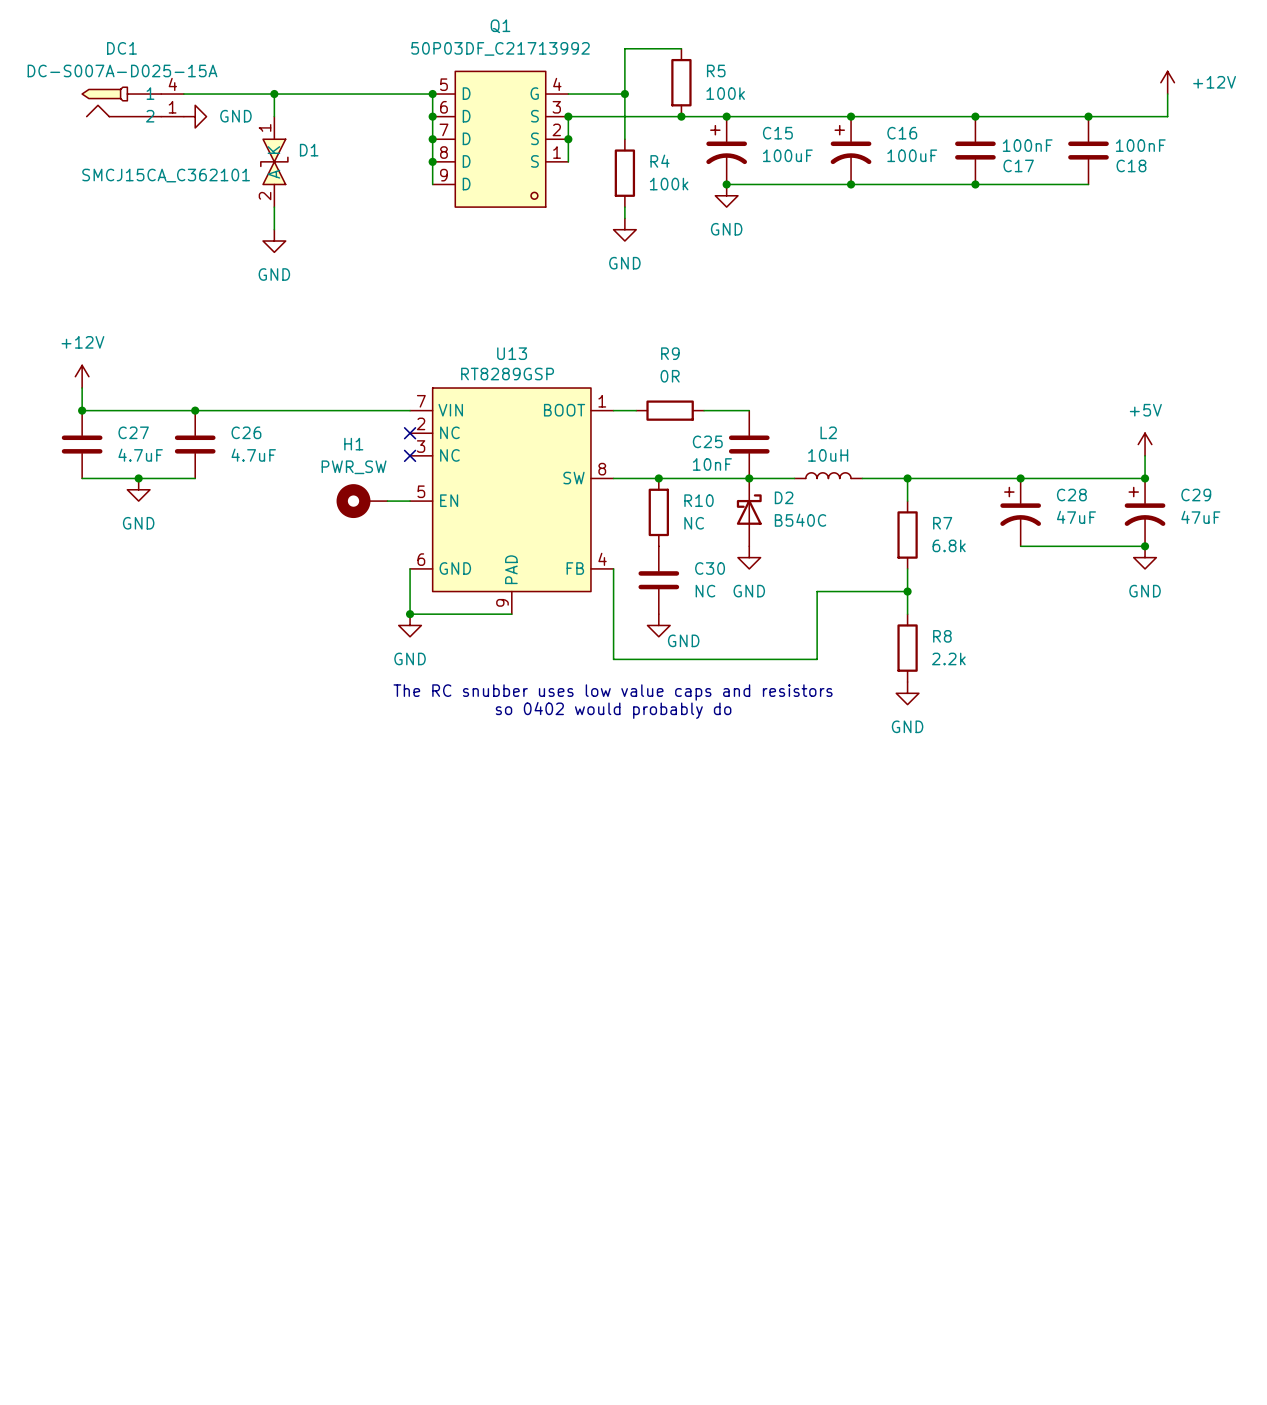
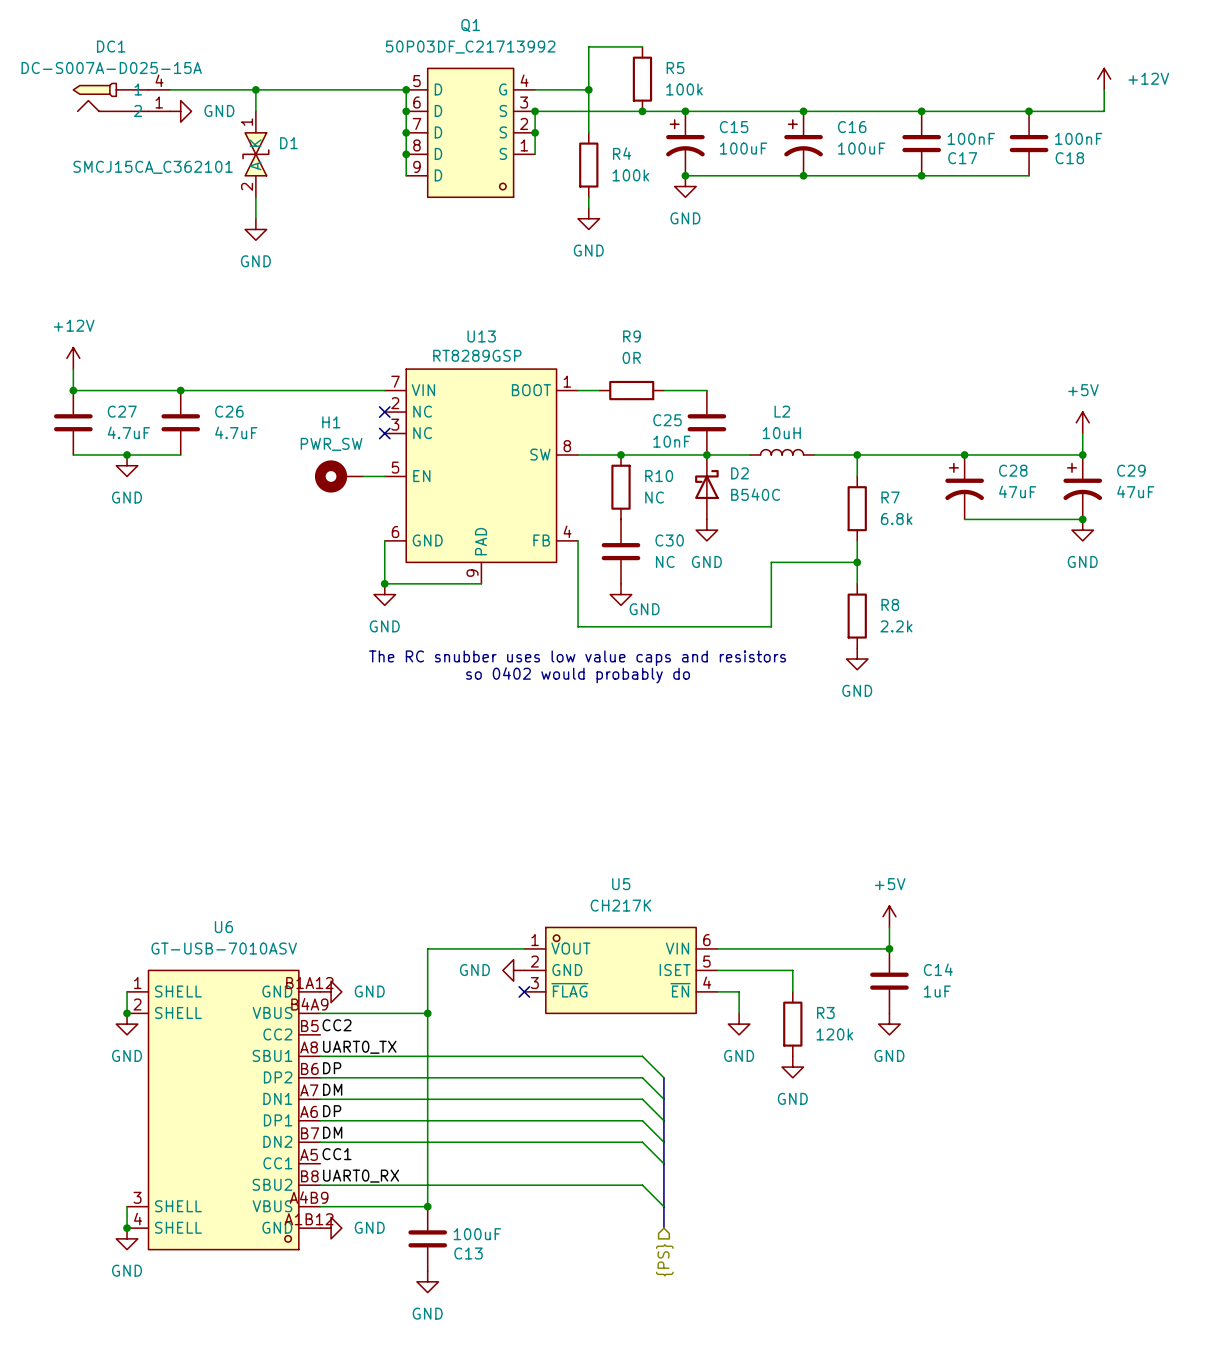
power symbol: none -> +5V (889, 916)
wire: none -> (889, 927) (889, 948) (717, 948)
wire: none -> (524, 948) (427, 948) (427, 1206) (320, 1206)
junction: none -> (889, 948)
power symbol: none -> GND (513, 970)
U5: none -> CH217K (620, 970)
wire: none -> (717, 970) (792, 970) (792, 991)
C14: none -> 1uF (889, 981)
wire: none -> (127, 991) (127, 1013)
power symbol: none -> GND (331, 991)
no-connect mark: none -> (524, 991)
wire: none -> (717, 991) (739, 991) (739, 1013)
junction: none -> (127, 1013)
wire: none -> (320, 1013) (427, 1013)
junction: none -> (427, 1013)
power symbol: none -> GND (127, 1024)
power symbol: none -> GND (739, 1024)
R3: none -> 120k (792, 1024)
power symbol: none -> GND (889, 1024)
label: none -> CC2 (337, 1025)
label: none -> UART0_TX (359, 1047)
wire: none -> (320, 1056) (642, 1056) (663, 1077)
power symbol: none -> GND (792, 1067)
label: none -> DP (332, 1068)
wire: none -> (320, 1077) (642, 1077) (663, 1099)
bus: none -> (663, 1077) (663, 1228)
label: none -> DM (332, 1089)
wire: none -> (320, 1099) (642, 1099) (663, 1120)
U6: none -> GT-USB-7010ASV (223, 1110)
label: none -> DP (332, 1111)
wire: none -> (320, 1120) (642, 1120) (663, 1142)
label: none -> DM (332, 1132)
wire: none -> (320, 1142) (642, 1142) (663, 1163)
label: none -> CC1 (337, 1154)
label: none -> UART0_RX (361, 1176)
wire: none -> (320, 1185) (642, 1185) (663, 1206)
wire: none -> (127, 1206) (127, 1228)
junction: none -> (427, 1206)
junction: none -> (127, 1228)
power symbol: none -> GND (331, 1228)
power symbol: none -> GND (127, 1238)
C13: none -> 100uF (427, 1238)
hierarchical label: none -> {PS} (664, 1260)
power symbol: none -> GND (427, 1281)

